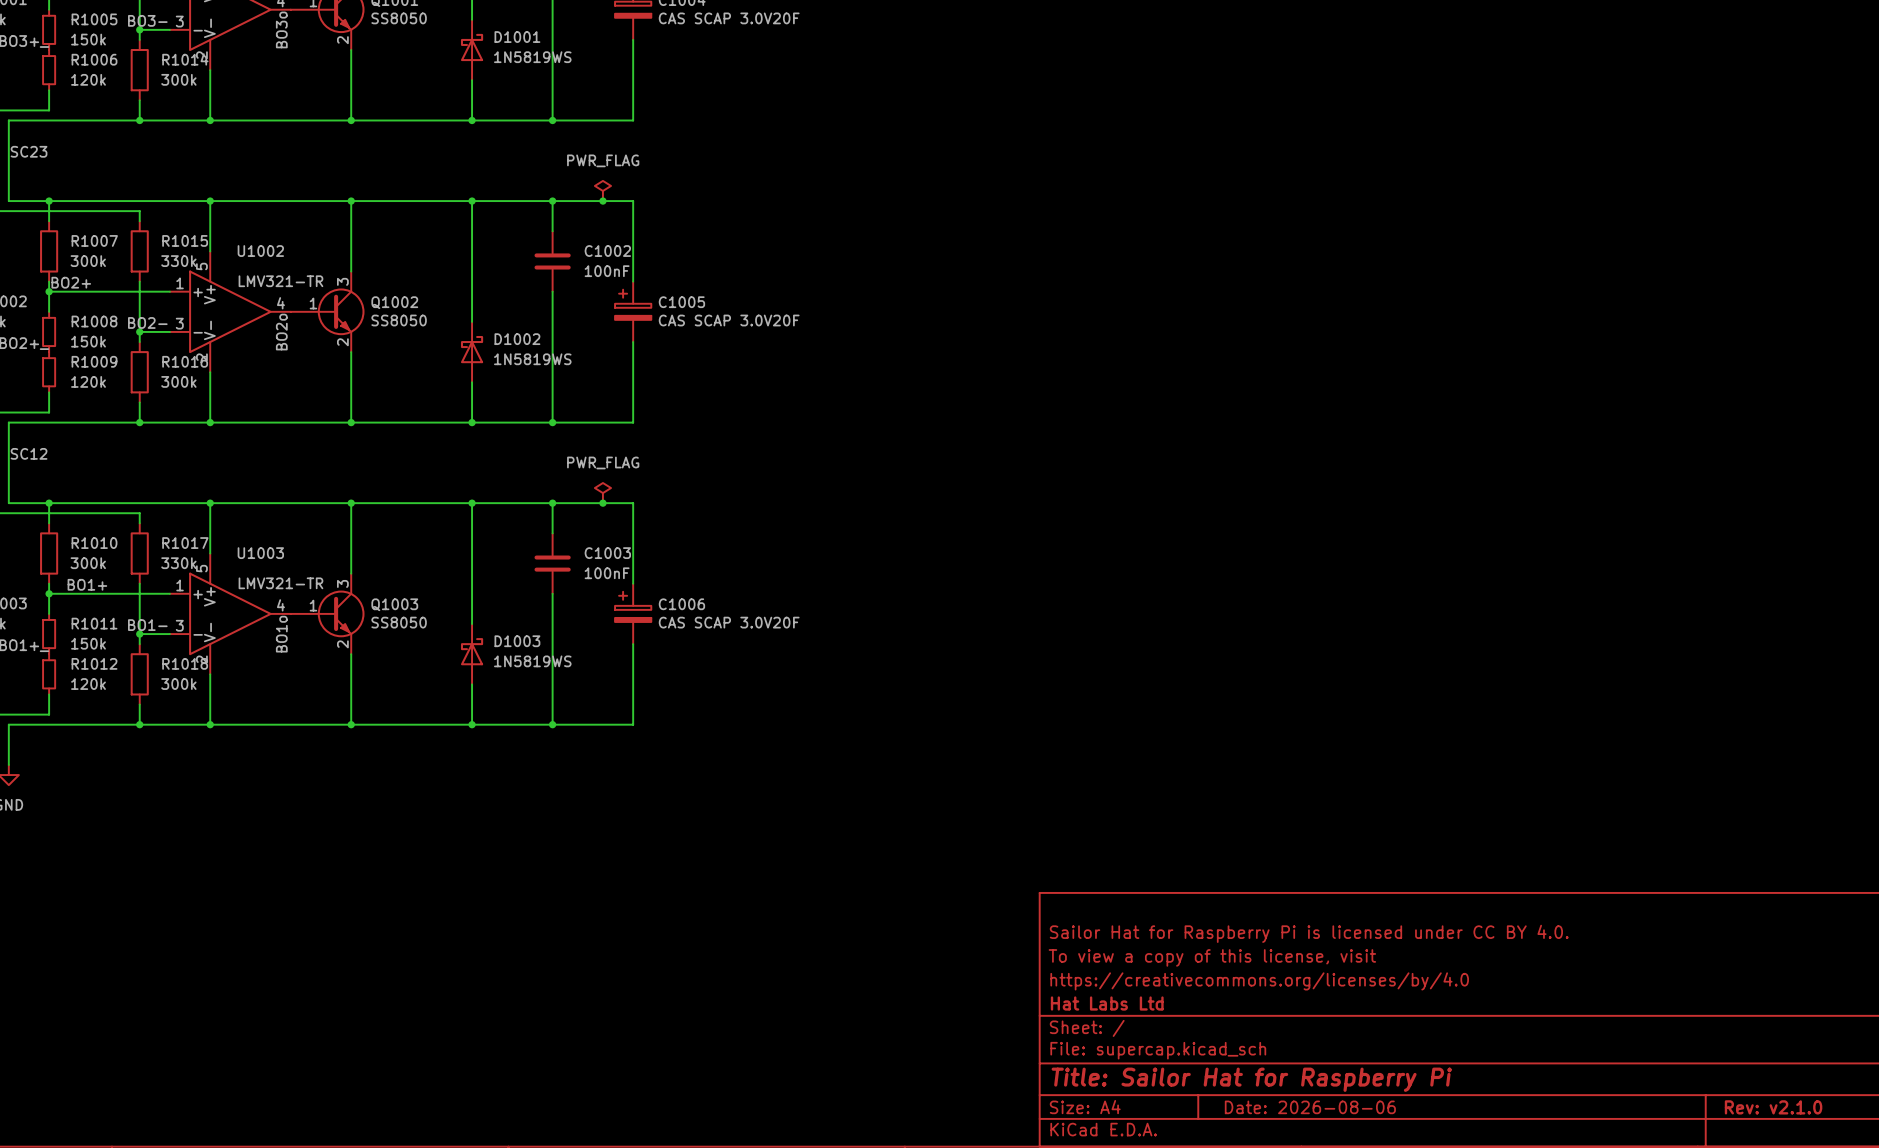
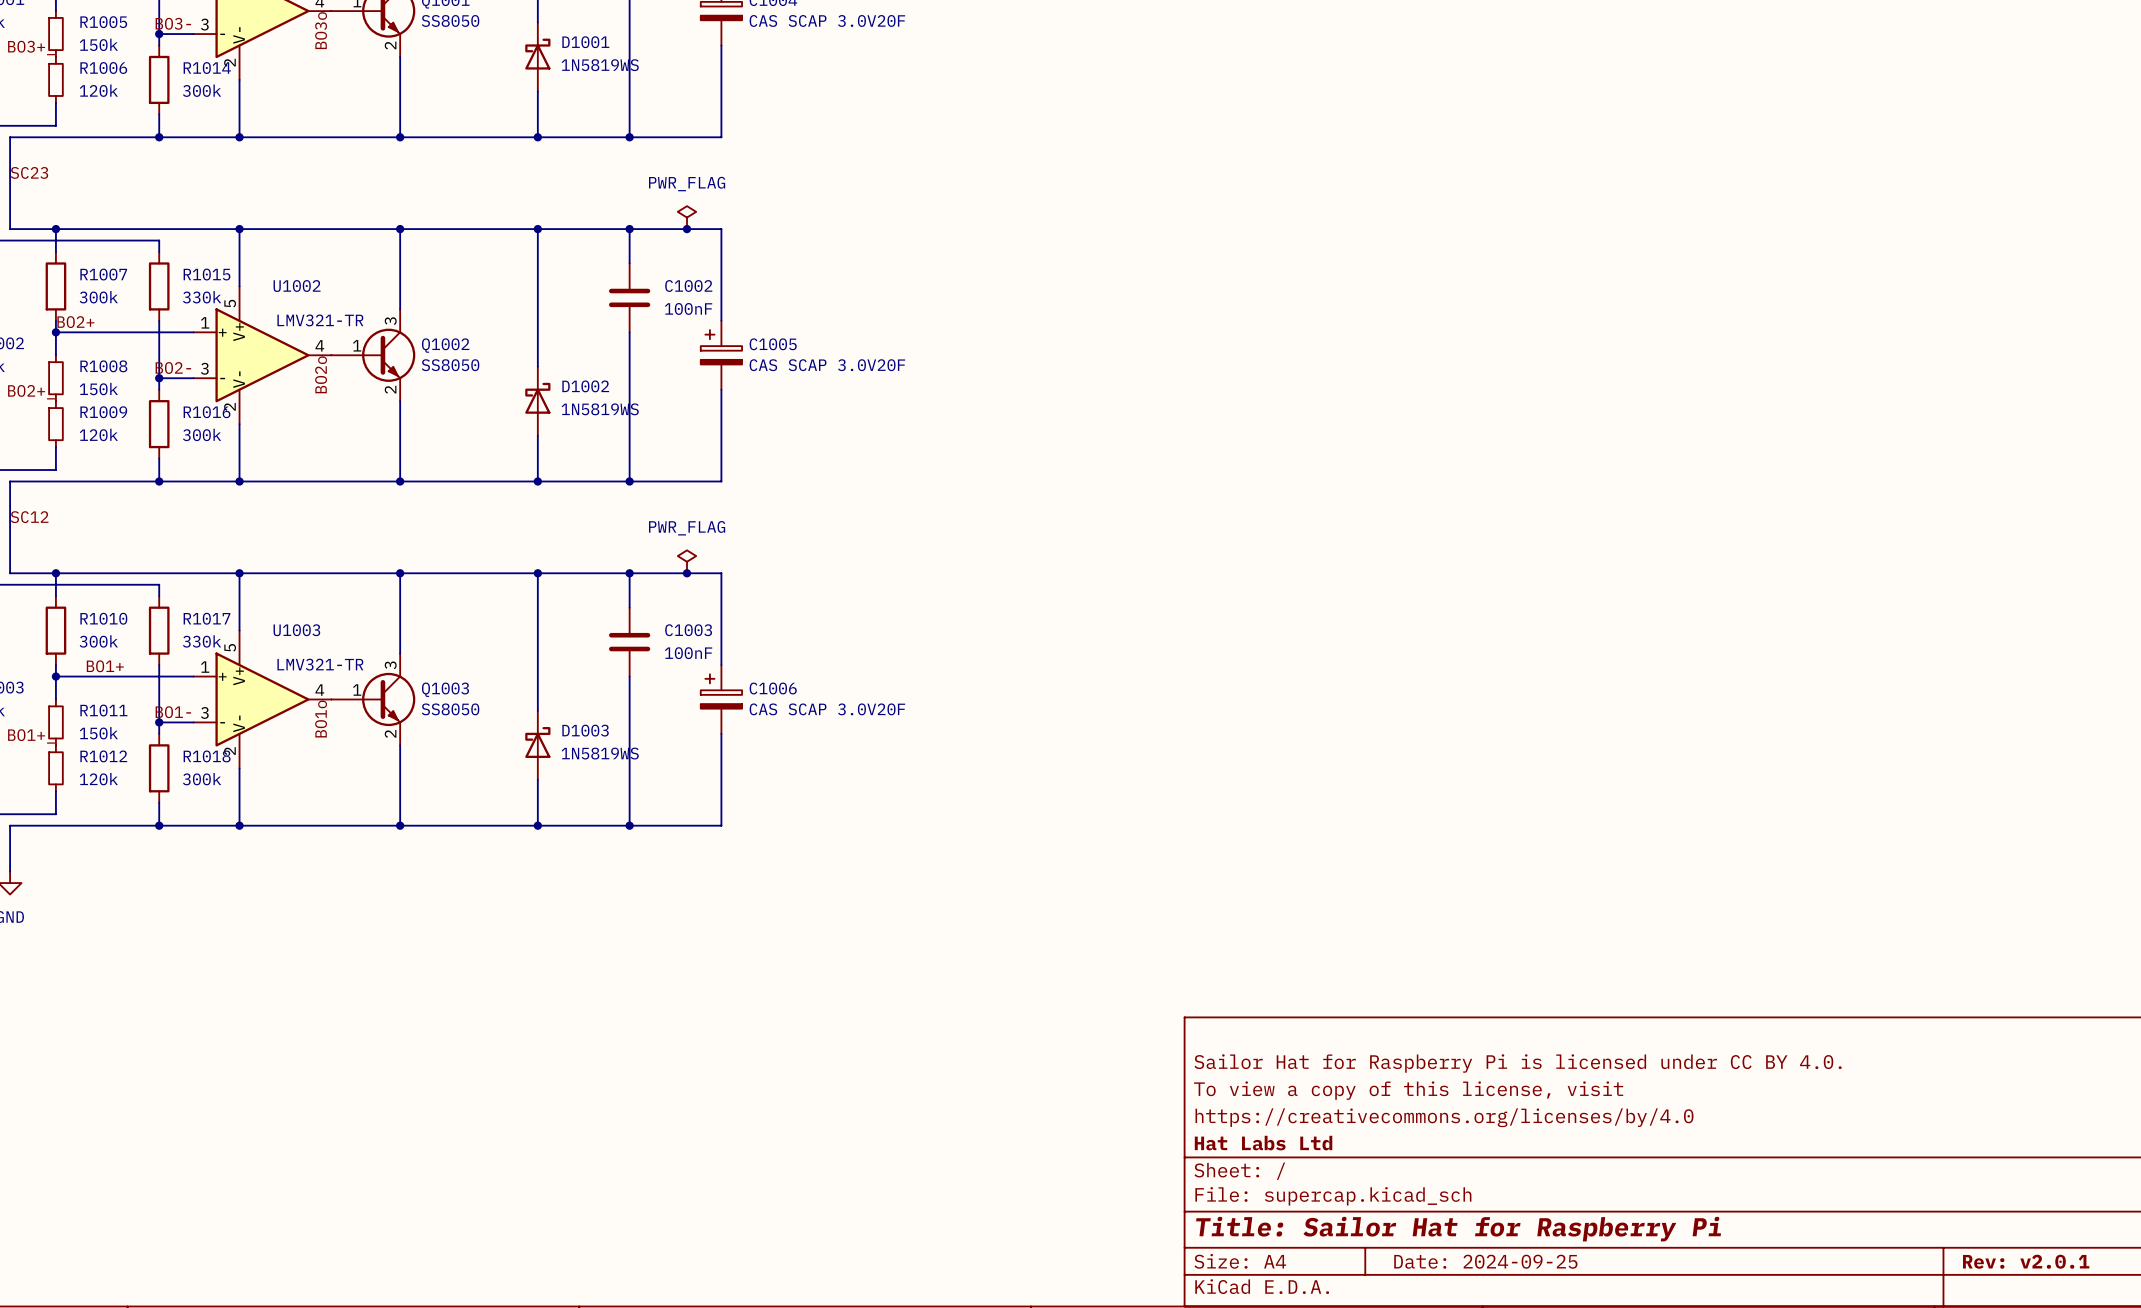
title block: Date: 2026-08-06 (1310, 1107) -> Date: 2024-09-25 (1485, 1261)
title block: Rev: v2.1.0 (1773, 1107) -> Rev: v2.0.1 (2026, 1261)

